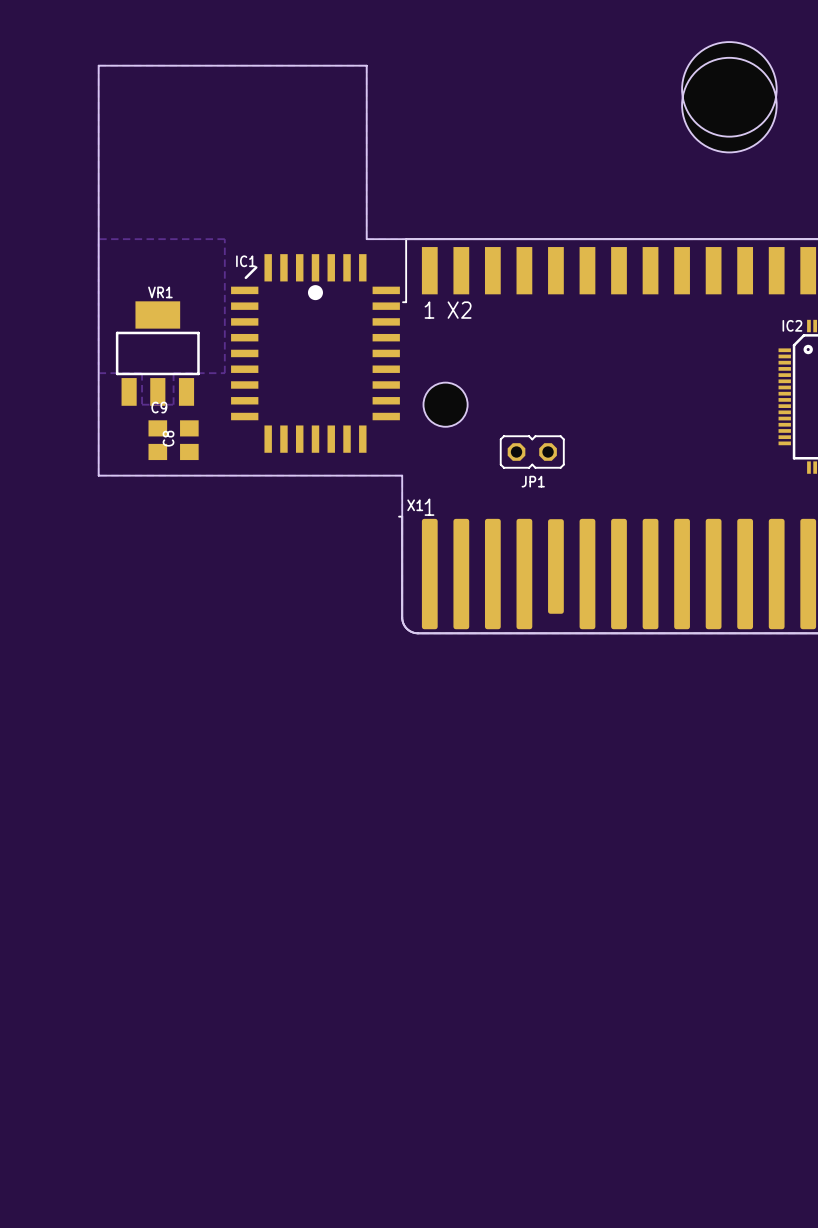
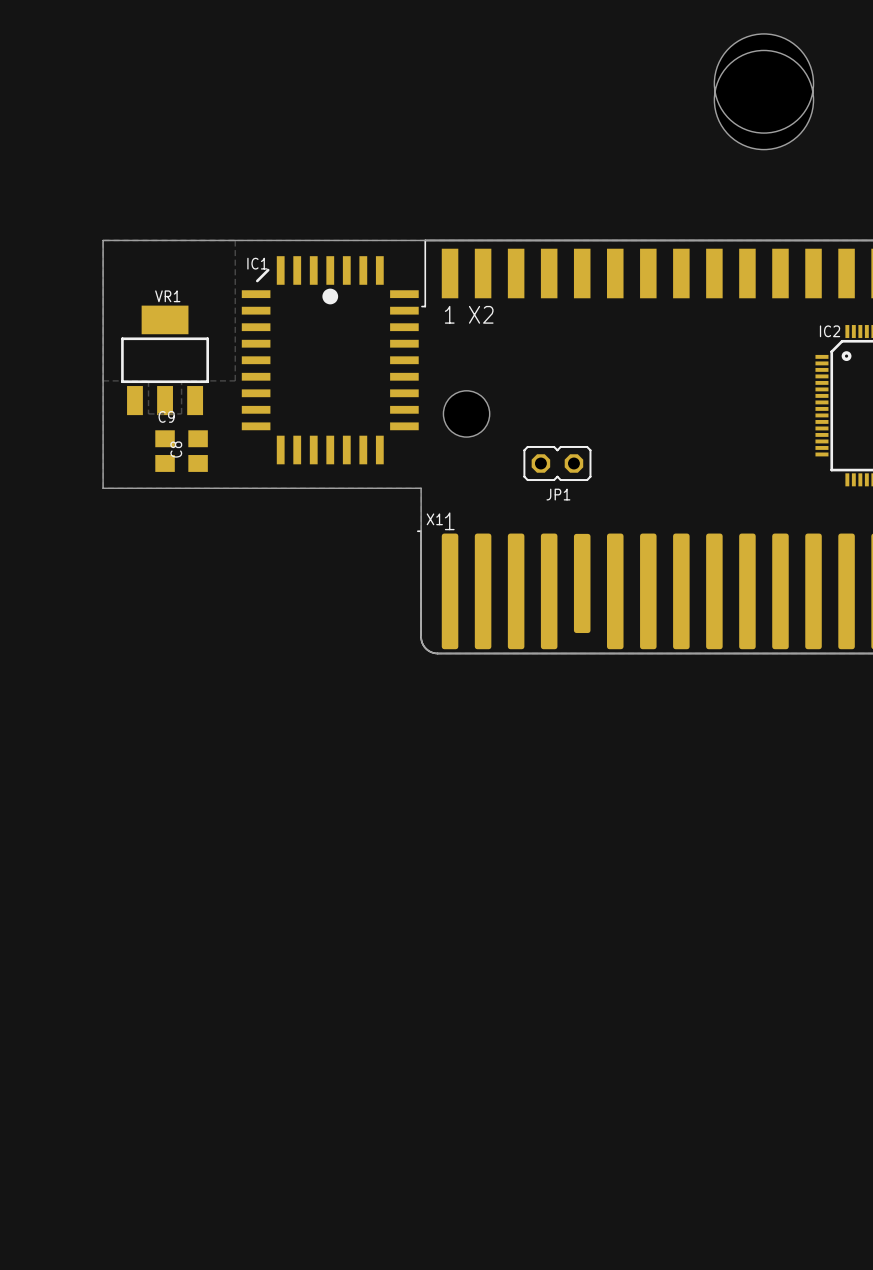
board edge: (98, 239) (98, 65) (366, 65) (366, 239) -> (103, 240) (383, 240)

